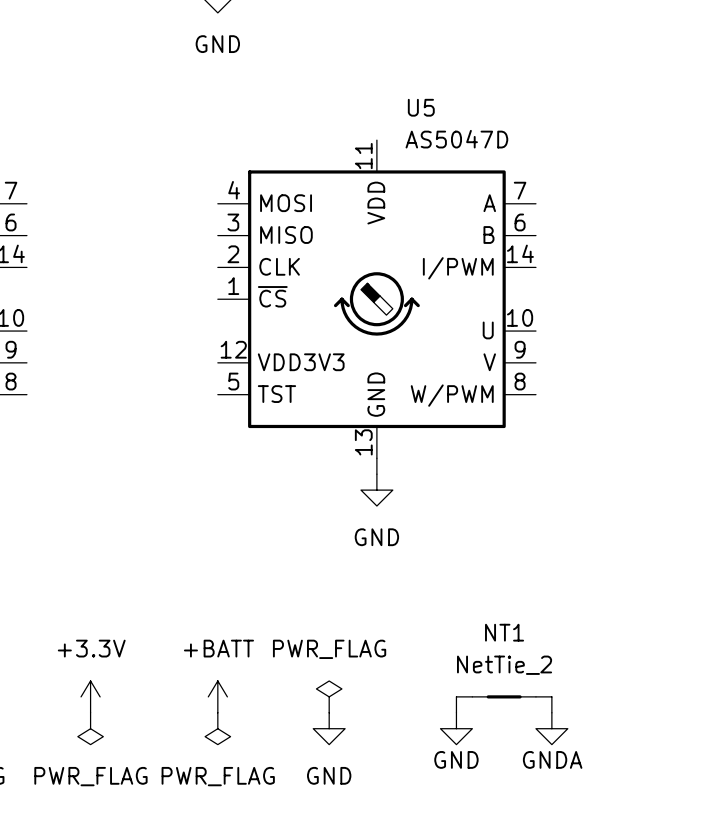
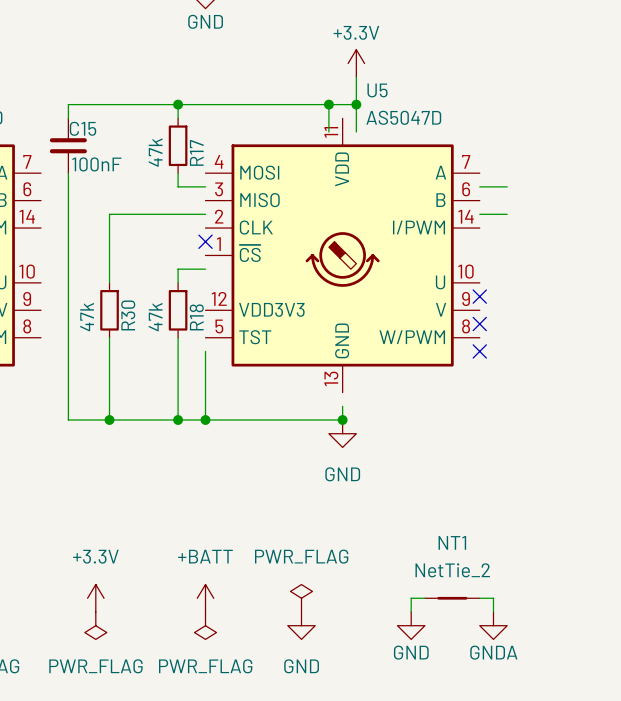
power symbol text position: GND (217, 44) -> GND (205, 21)
power symbol: none -> +3.3V (356, 63)
wire: none -> (356, 77) (356, 132)
wire: none -> (178, 104) (178, 118)
junction: none -> (178, 104)
wire: none -> (328, 104) (328, 132)
junction: none -> (328, 104)
wire: none -> (356, 104) (68, 104) (68, 118)
junction: none -> (356, 104)
C15: none -> 100nF (68, 145)
R17: none -> 47k (178, 145)
wire: none -> (178, 173) (178, 186) (205, 186)
wire: none -> (479, 186) (507, 186)
wire: none -> (205, 214) (109, 214) (109, 282)
wire: none -> (479, 214) (507, 214)
no-connect mark: none -> (205, 241)
wire: none -> (205, 269) (178, 269) (178, 282)
no-connect mark: none -> (479, 296)
R30: none -> 47k (109, 310)
R18: none -> 47k (178, 310)
no-connect mark: none -> (479, 324)
wire: none -> (109, 337) (109, 420)
wire: none -> (178, 337) (178, 420)
wire: none -> (205, 351) (205, 420)
no-connect mark: none -> (479, 351)
wire: (376, 458) (376, 474) -> (68, 173) (68, 420) (342, 420) (342, 406)
junction: none -> (109, 420)
junction: none -> (178, 420)
junction: none -> (205, 420)
power symbol position: GND (376, 490) -> GND (342, 433)
junction: none -> (342, 420)

